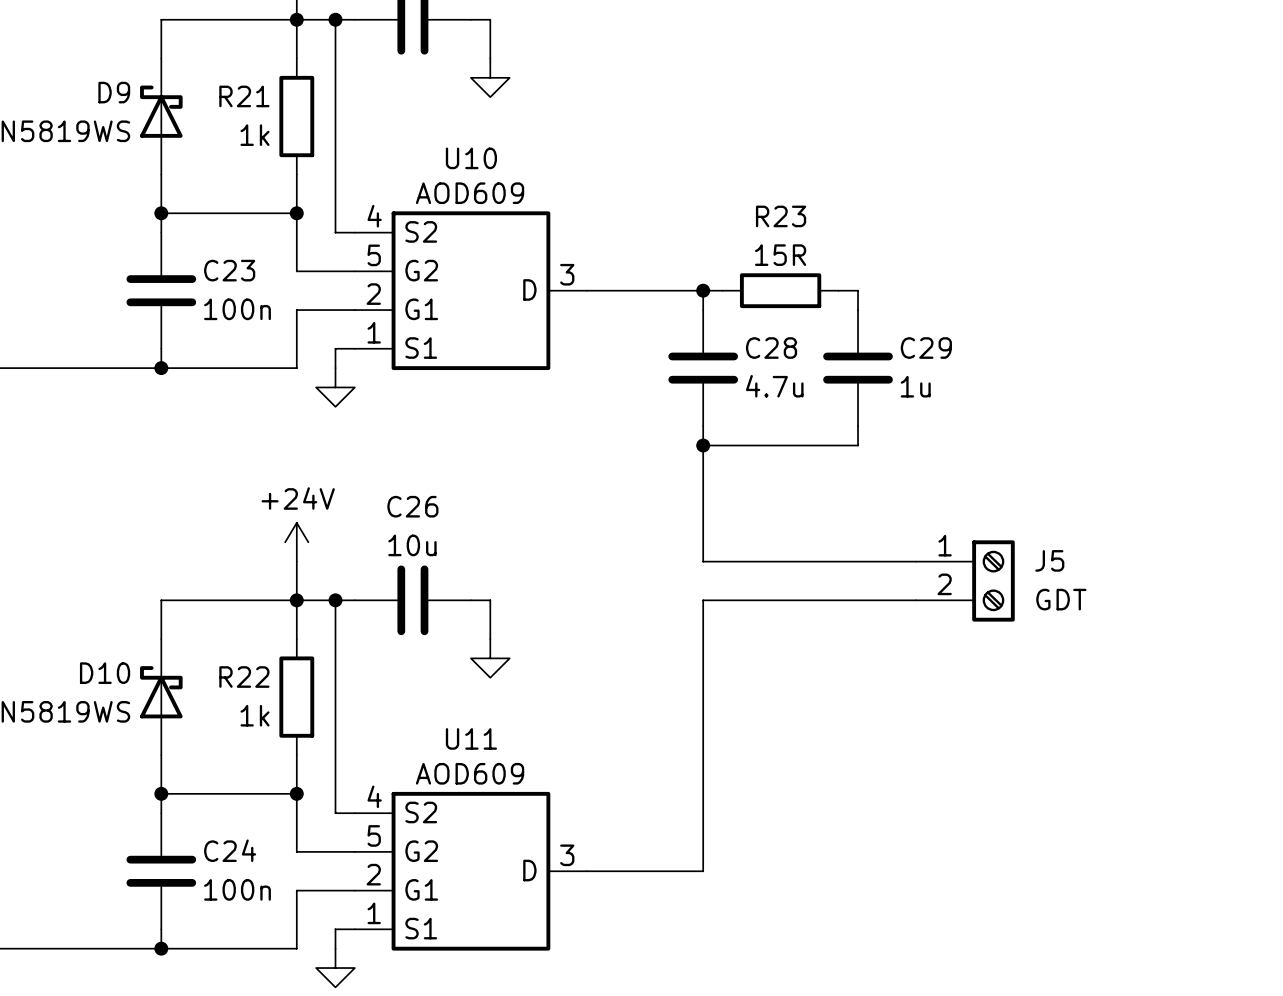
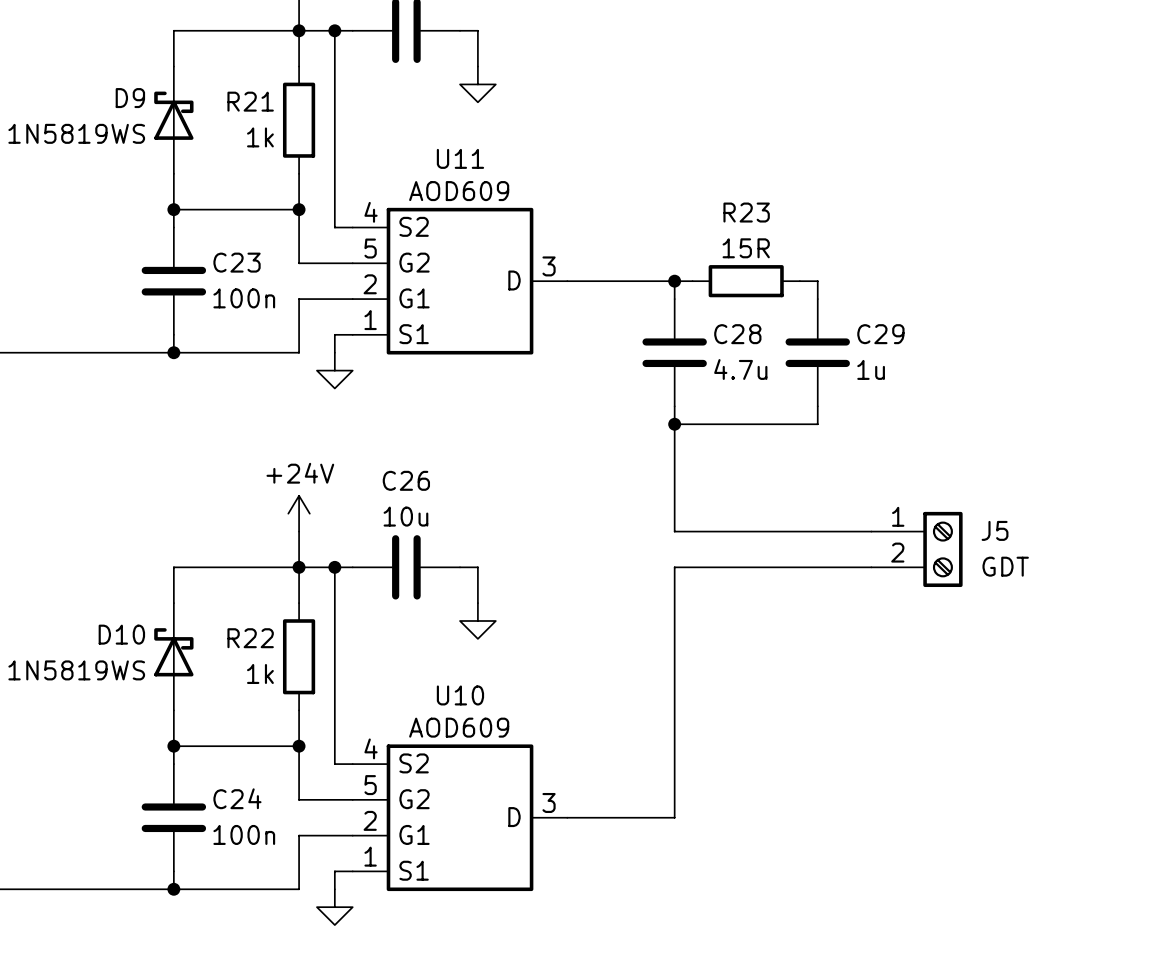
U10 name: U10 (471, 158) -> U11 (460, 158)
U11 name: U11 (471, 738) -> U10 (460, 695)

